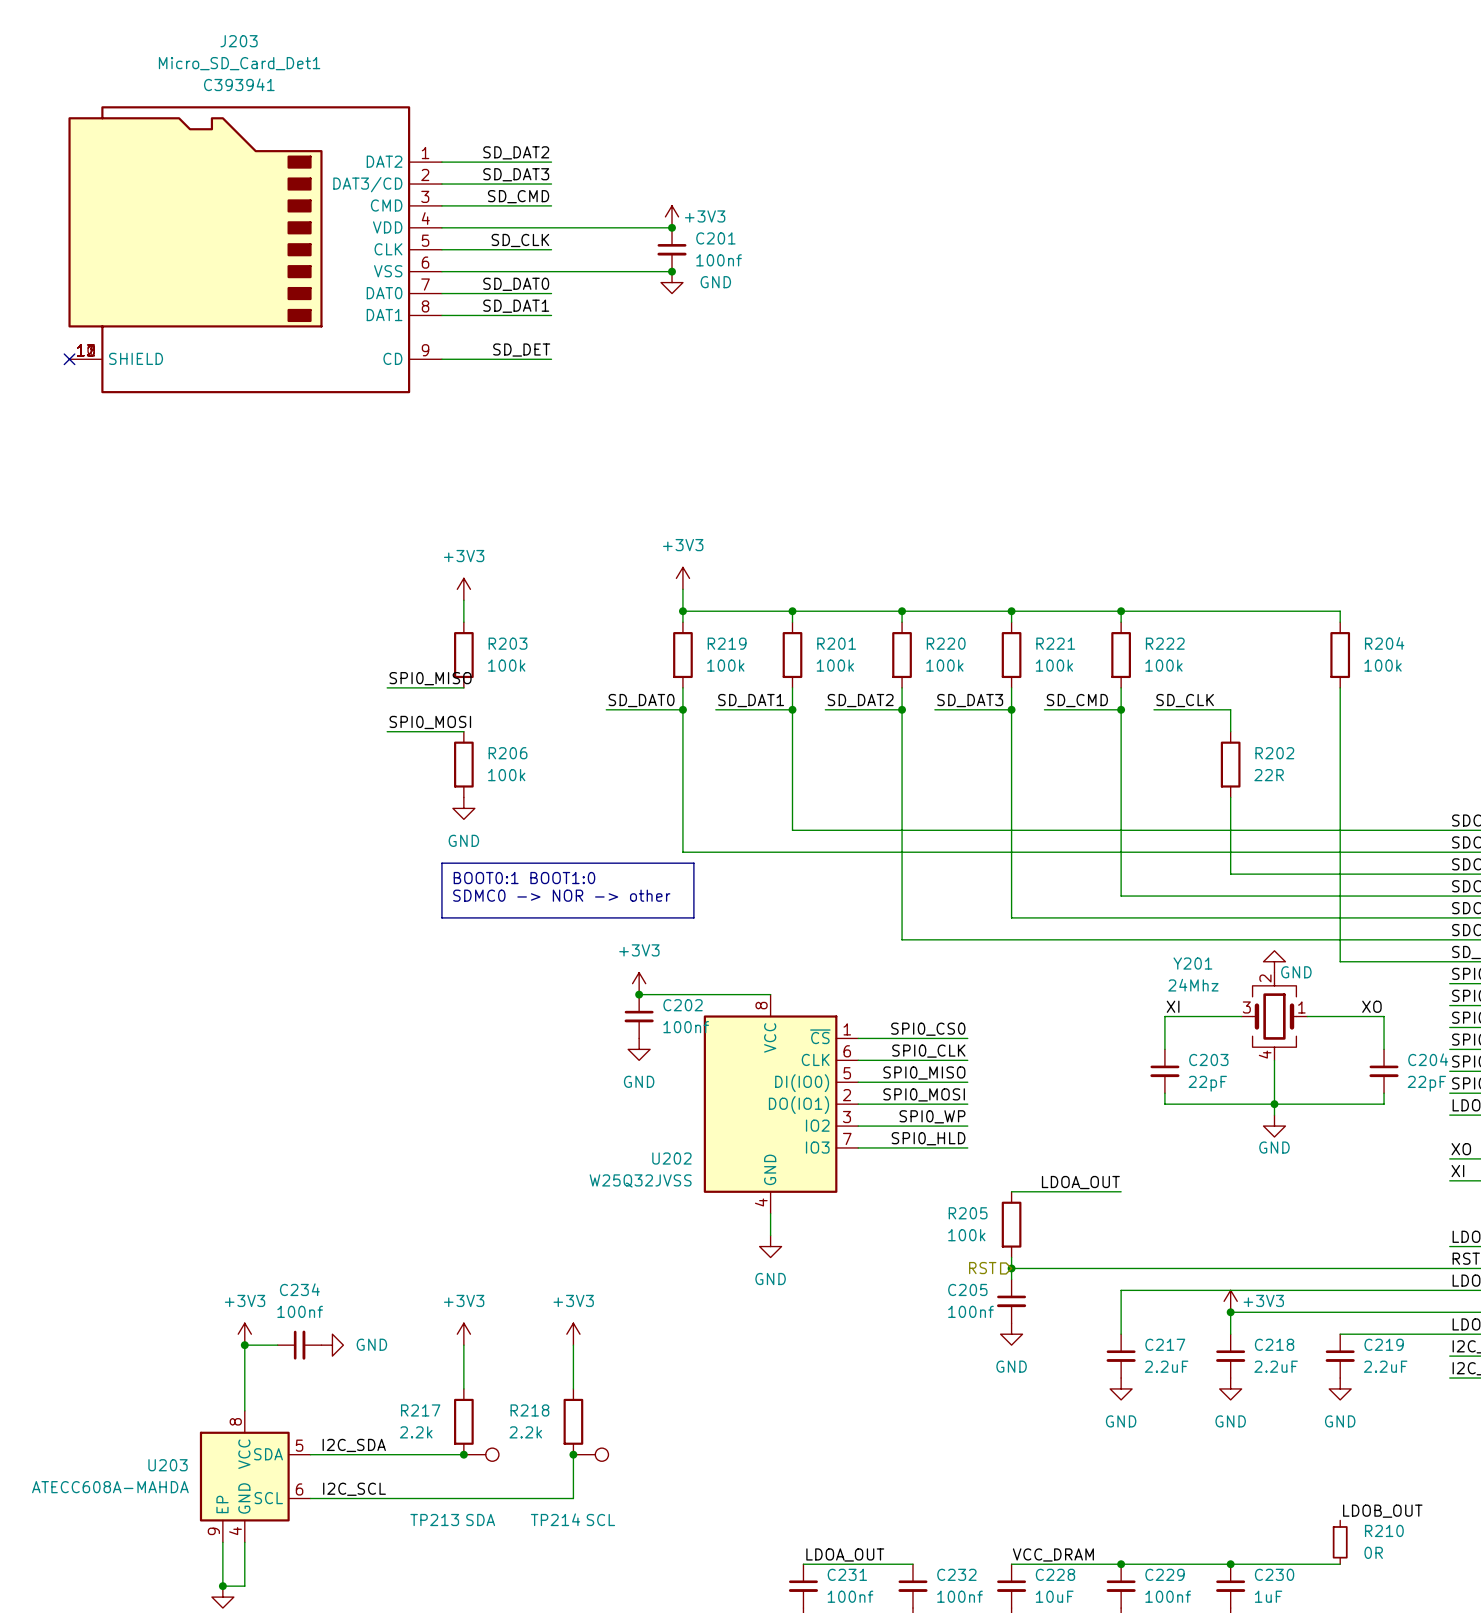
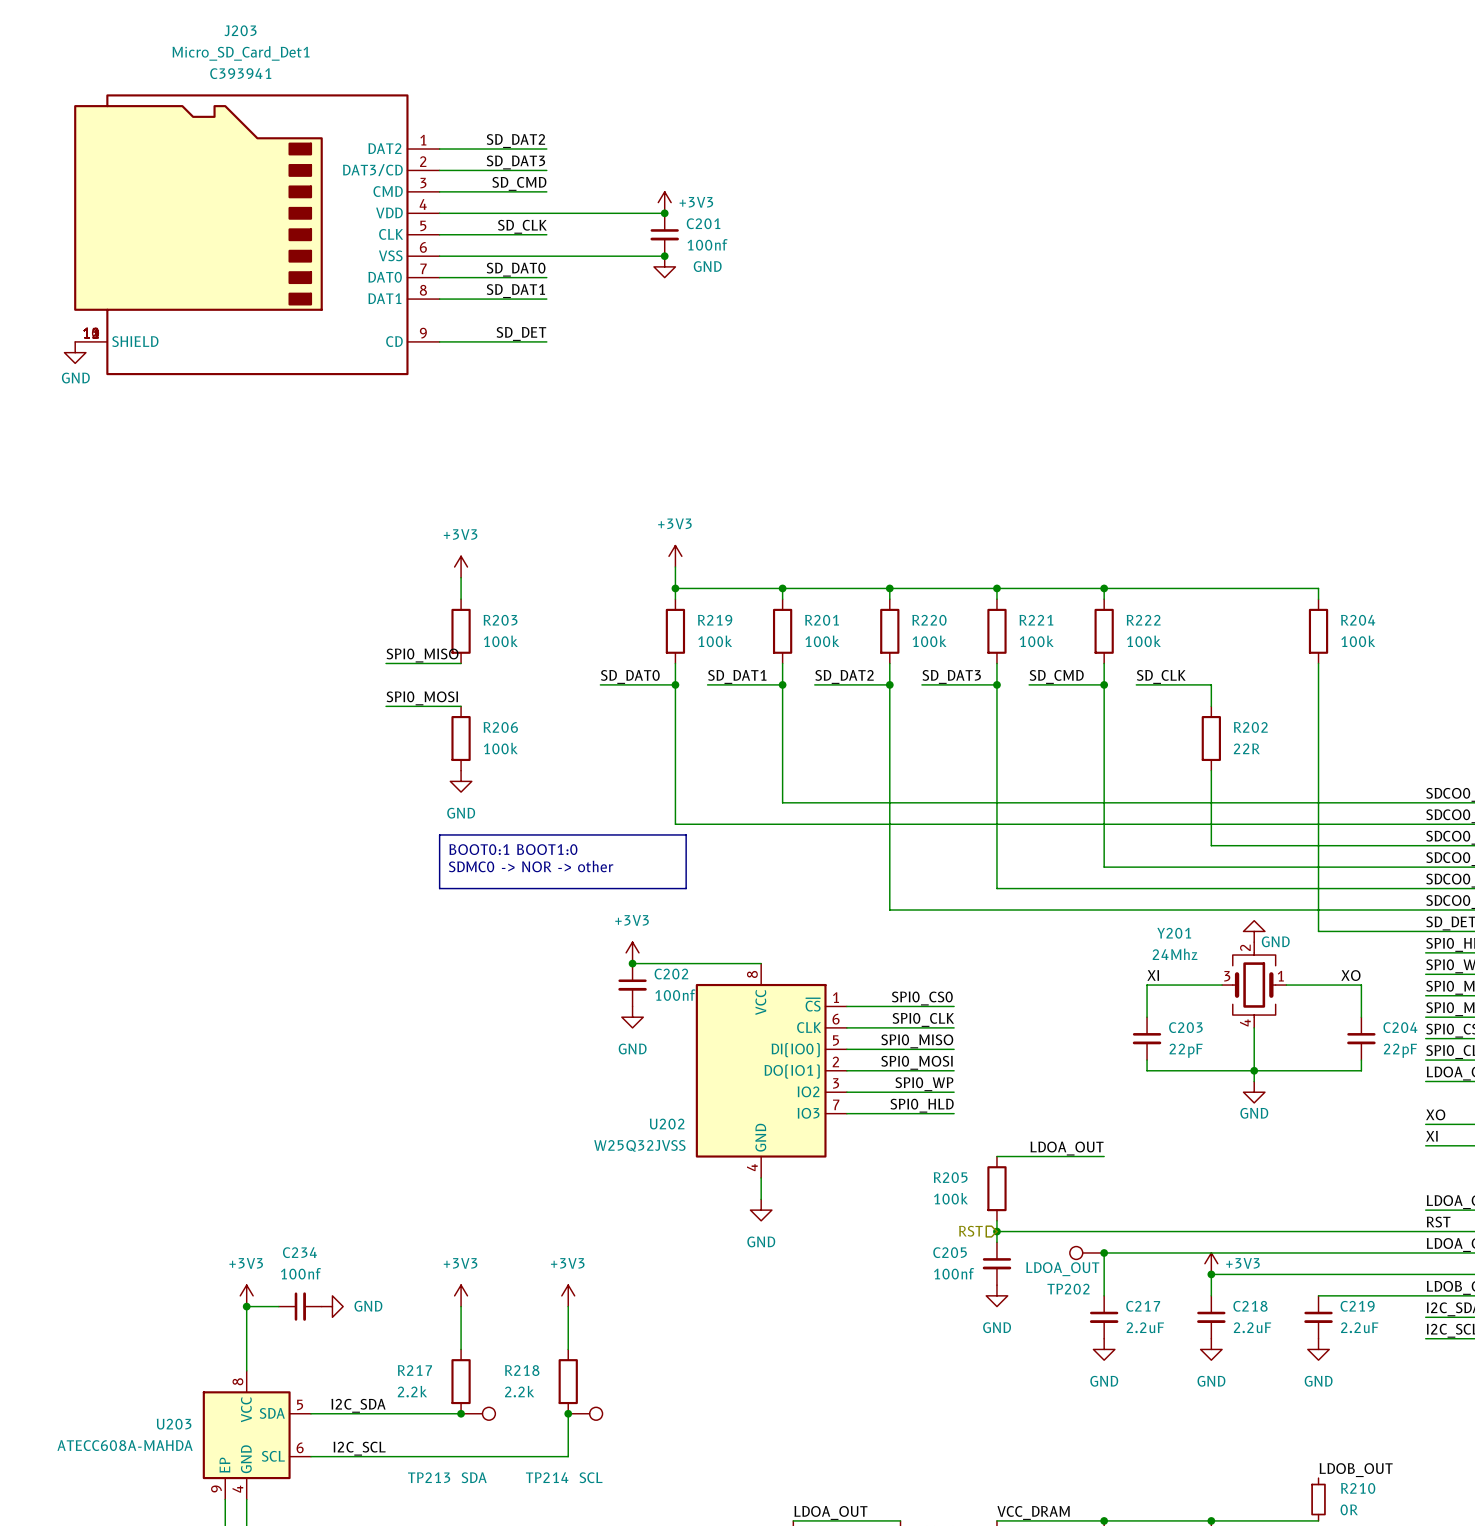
no-connect mark: (69, 359) -> none
power symbol: none -> GND (75, 352)
TP202: none -> LDOA_OUT (1087, 1252)
junction: none -> (1104, 1252)

